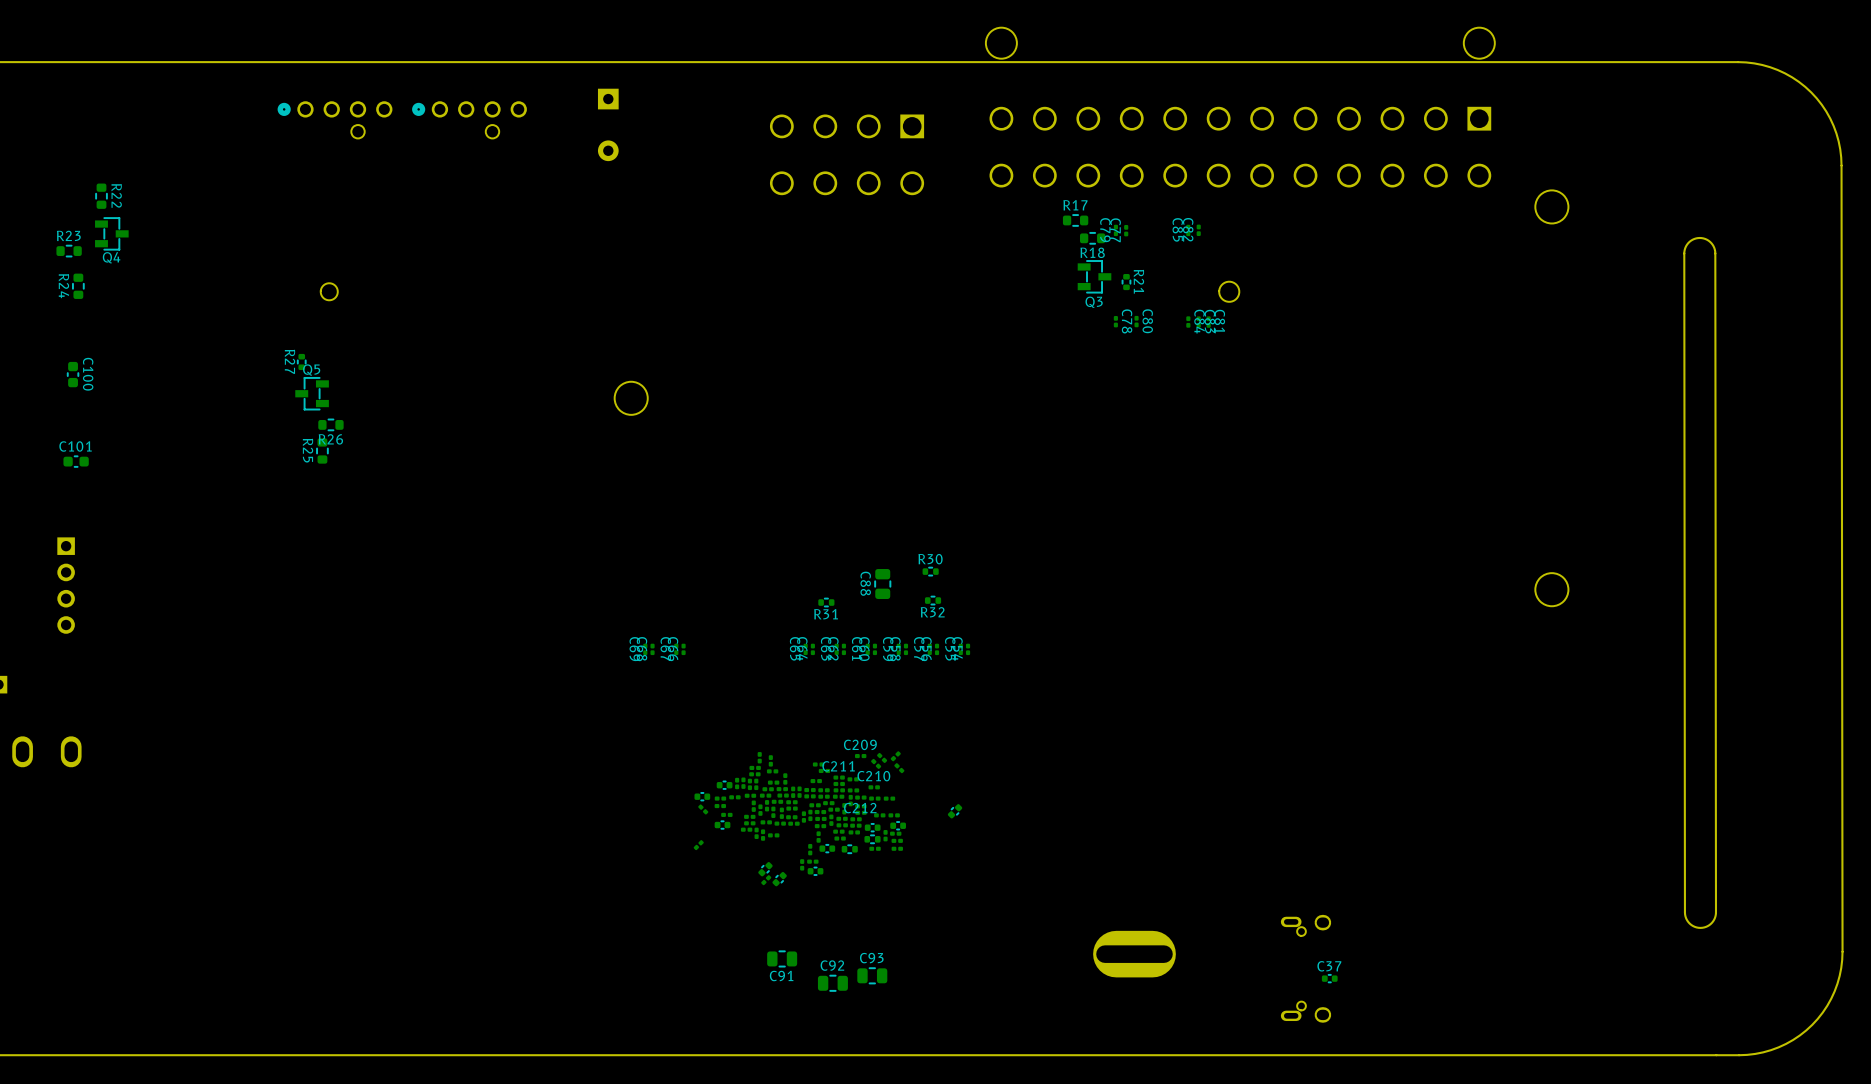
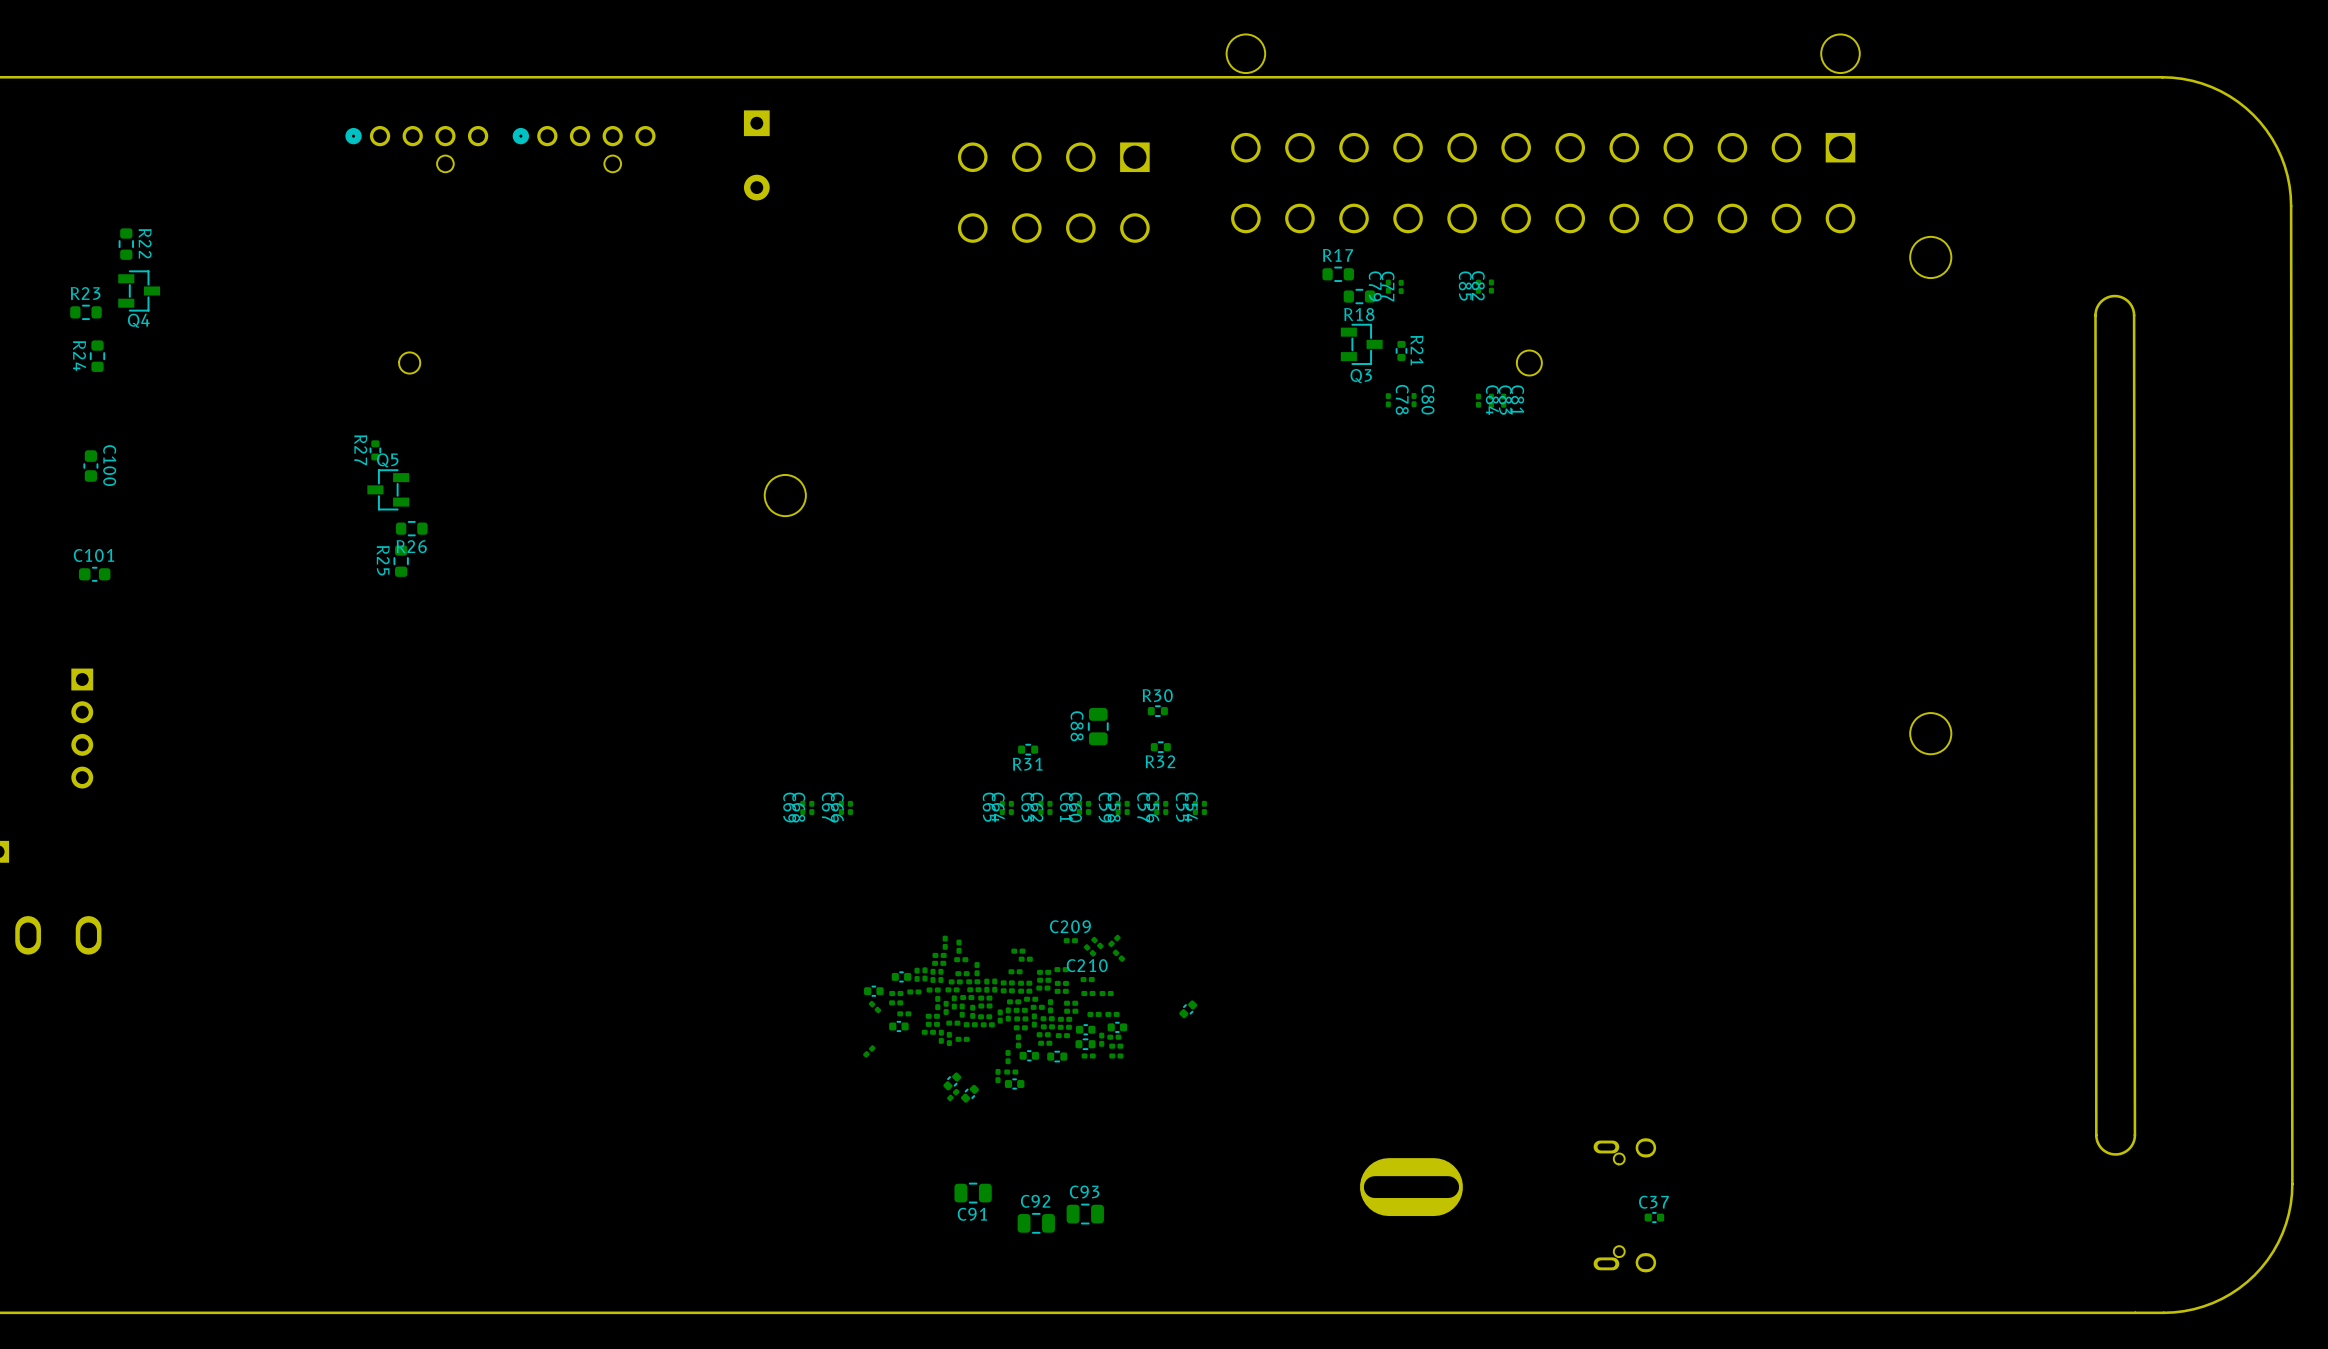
C211: (839, 777) -> none
part: none -> (1044, 972)
part: (839, 783) -> none
part: none -> (1044, 980)
part: (839, 790) -> none
part: none -> (1043, 988)
part: (838, 796) -> none
C212: (860, 797) -> none
part rotation: 0° (850, 800) -> 90° clockwise (1061, 991)

